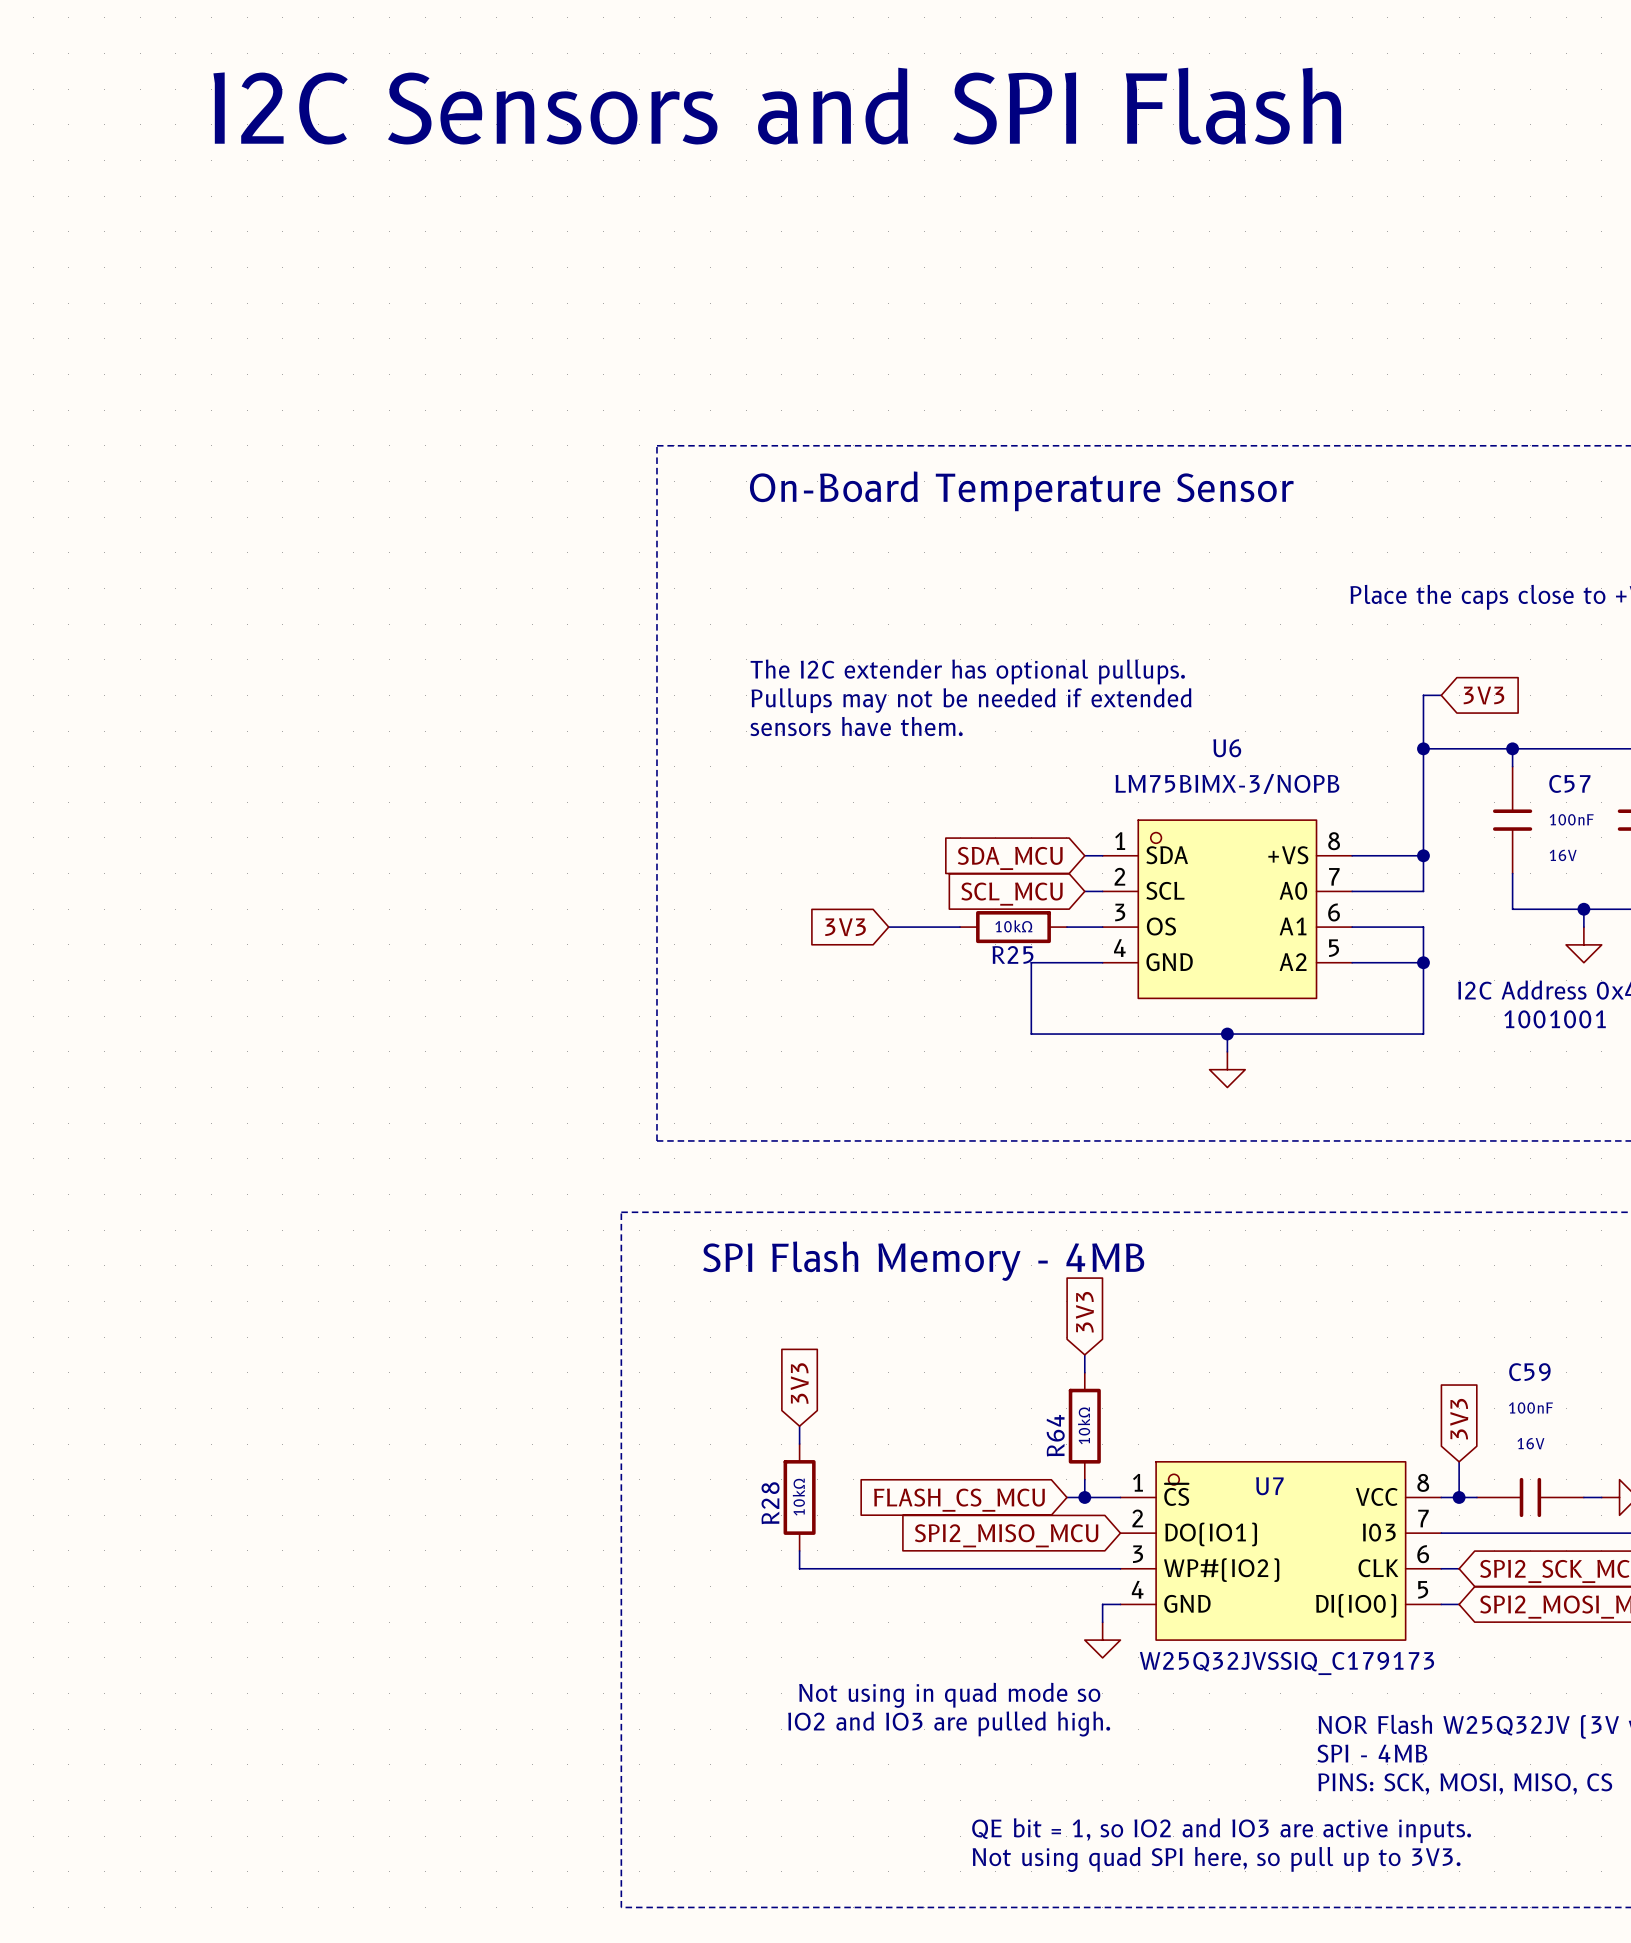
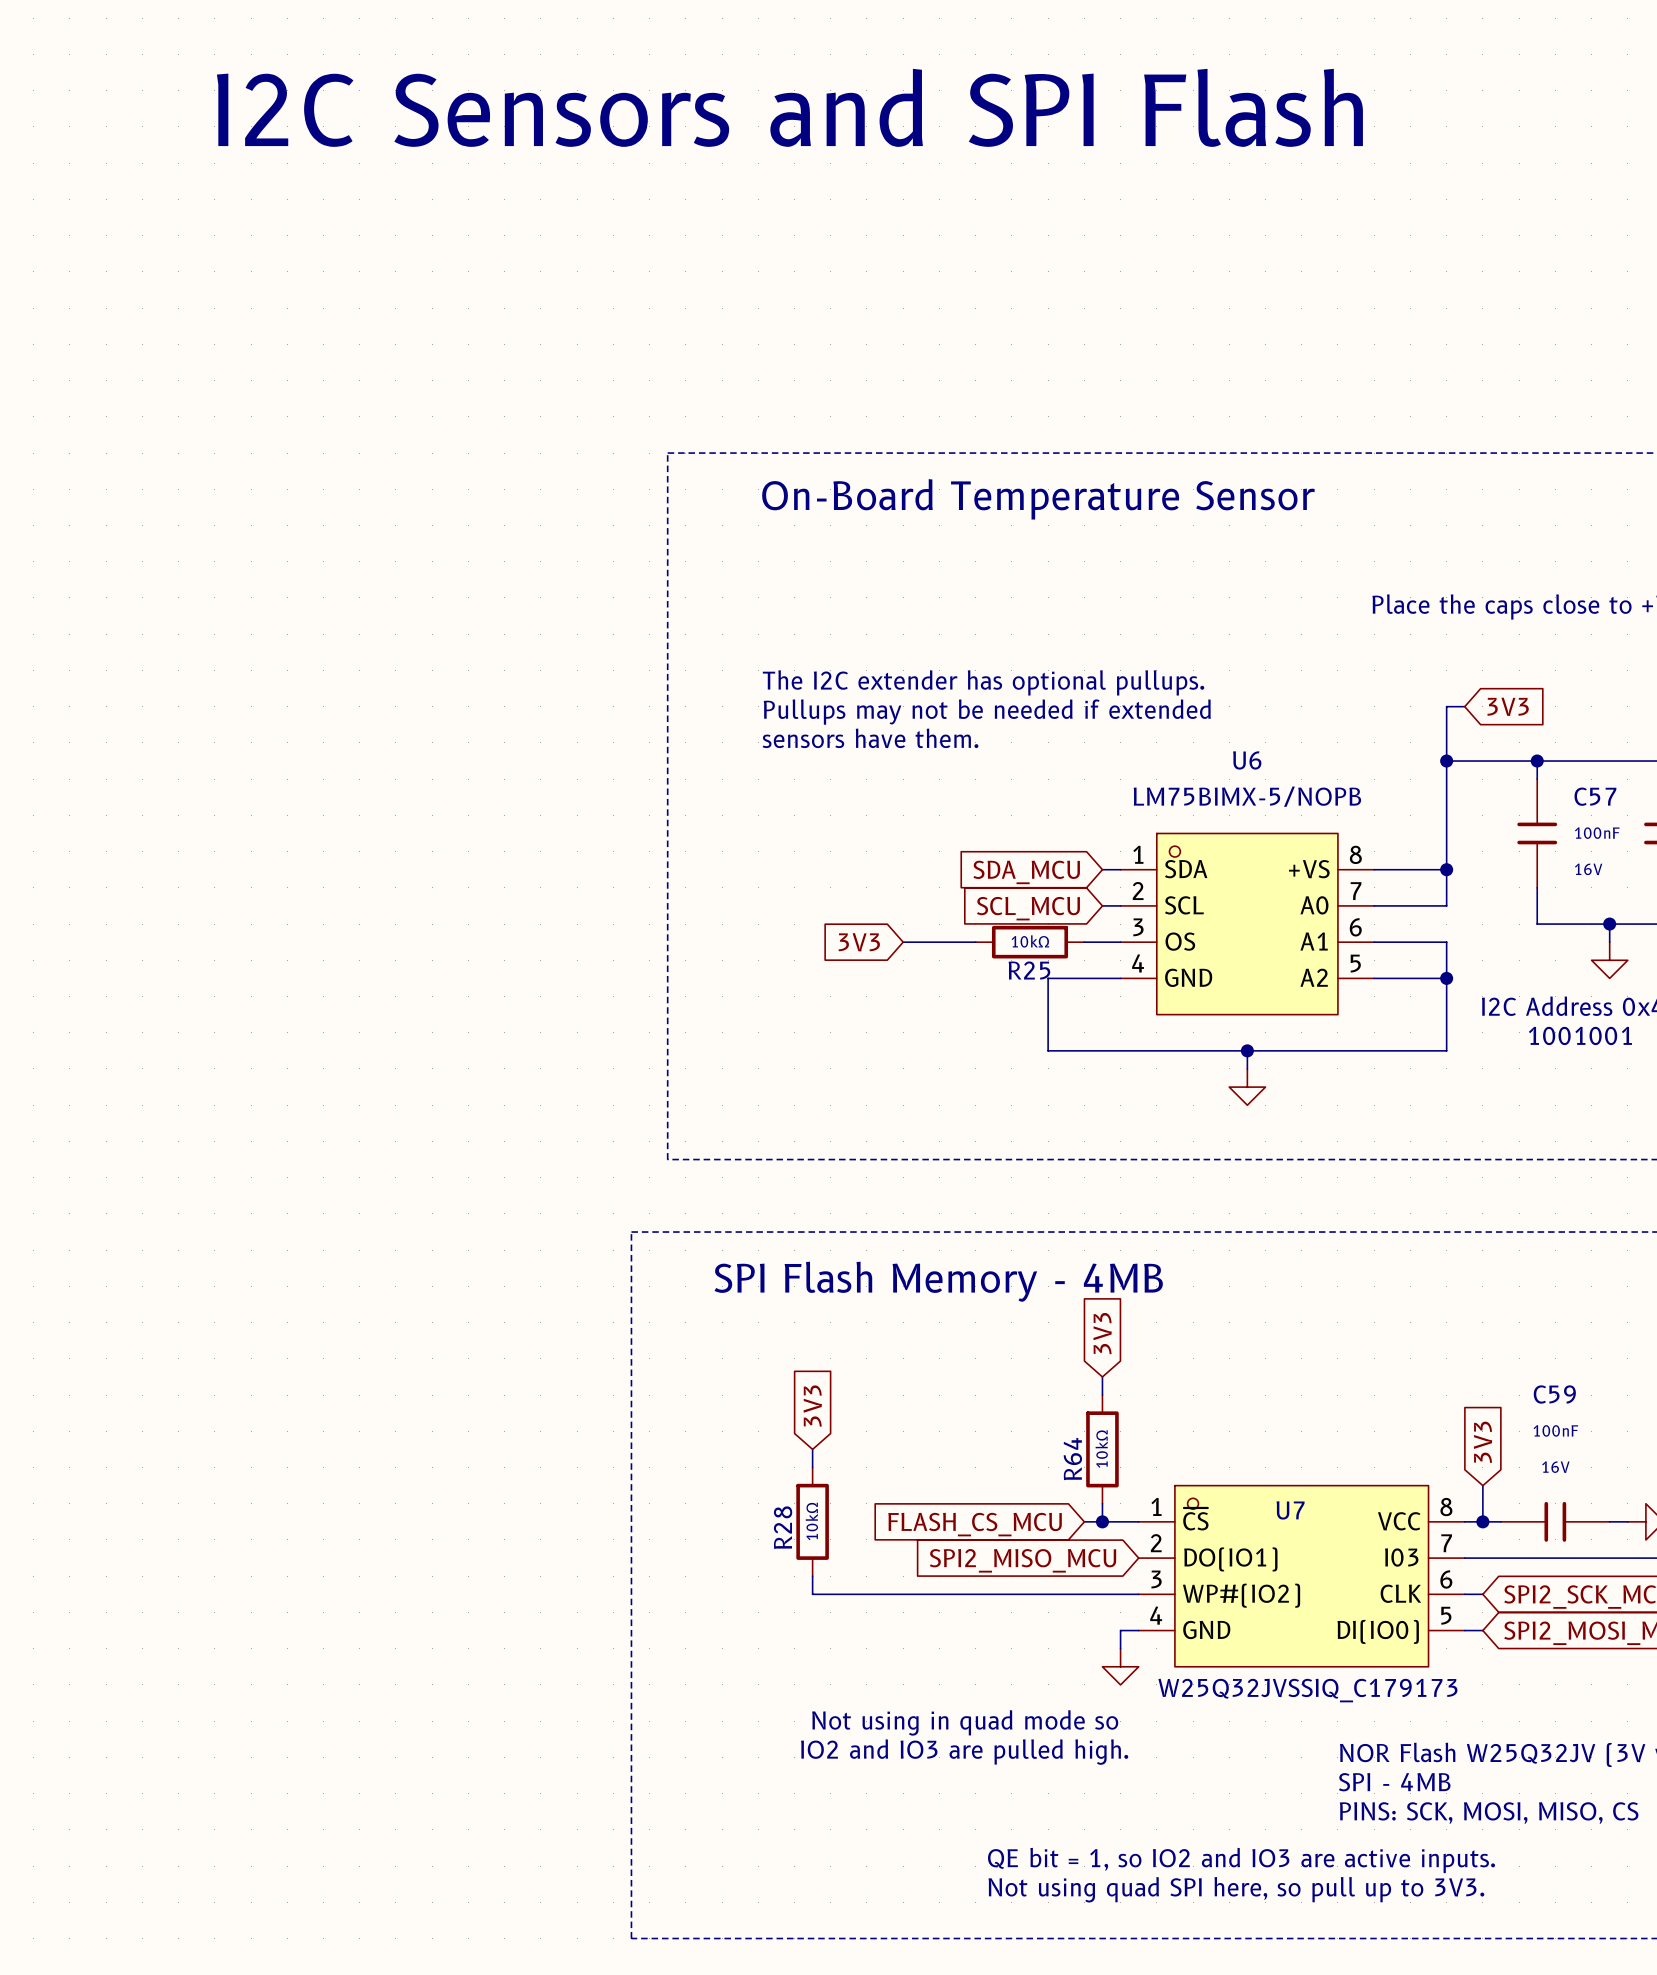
U6 value: LM75BIMX-3/NOPB (1227, 783) -> LM75BIMX-5/NOPB (1247, 796)

